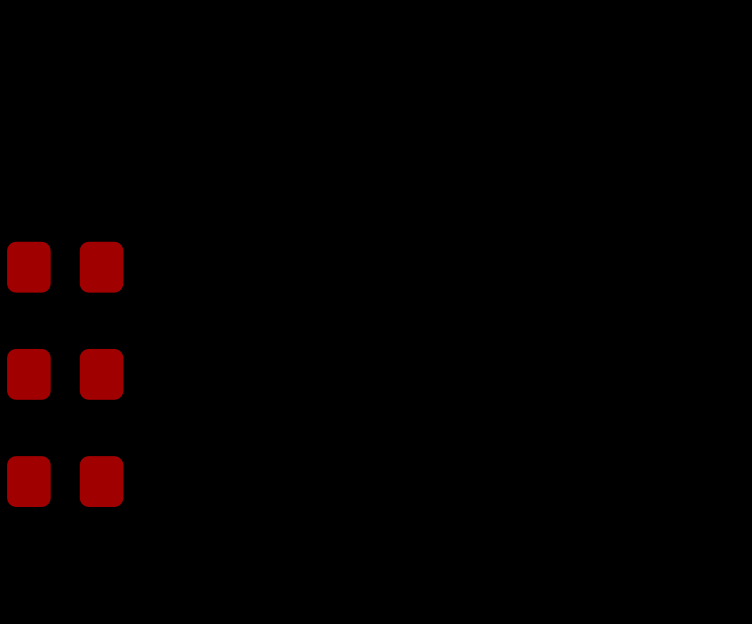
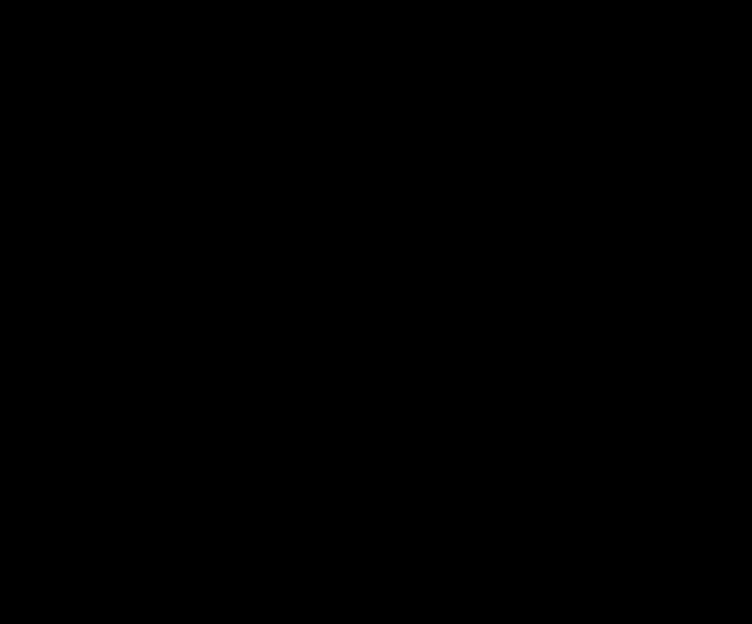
part: (65, 267) -> none
part: (65, 374) -> none
part: (65, 481) -> none

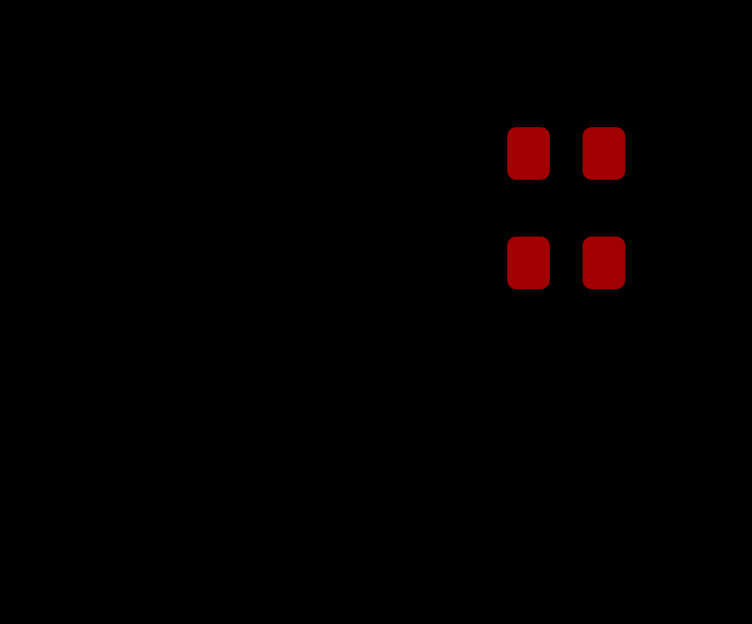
part: none -> (566, 153)
part: none -> (566, 262)

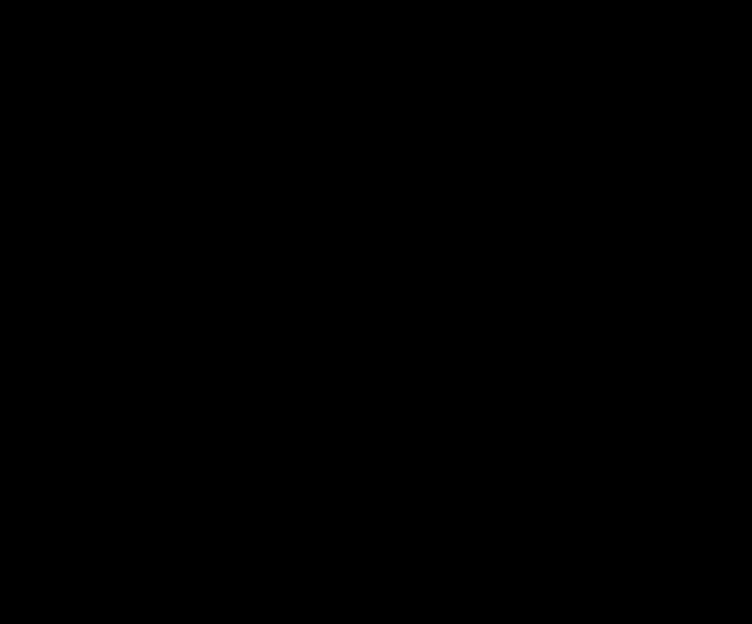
part: (566, 153) -> none
part: (566, 262) -> none

